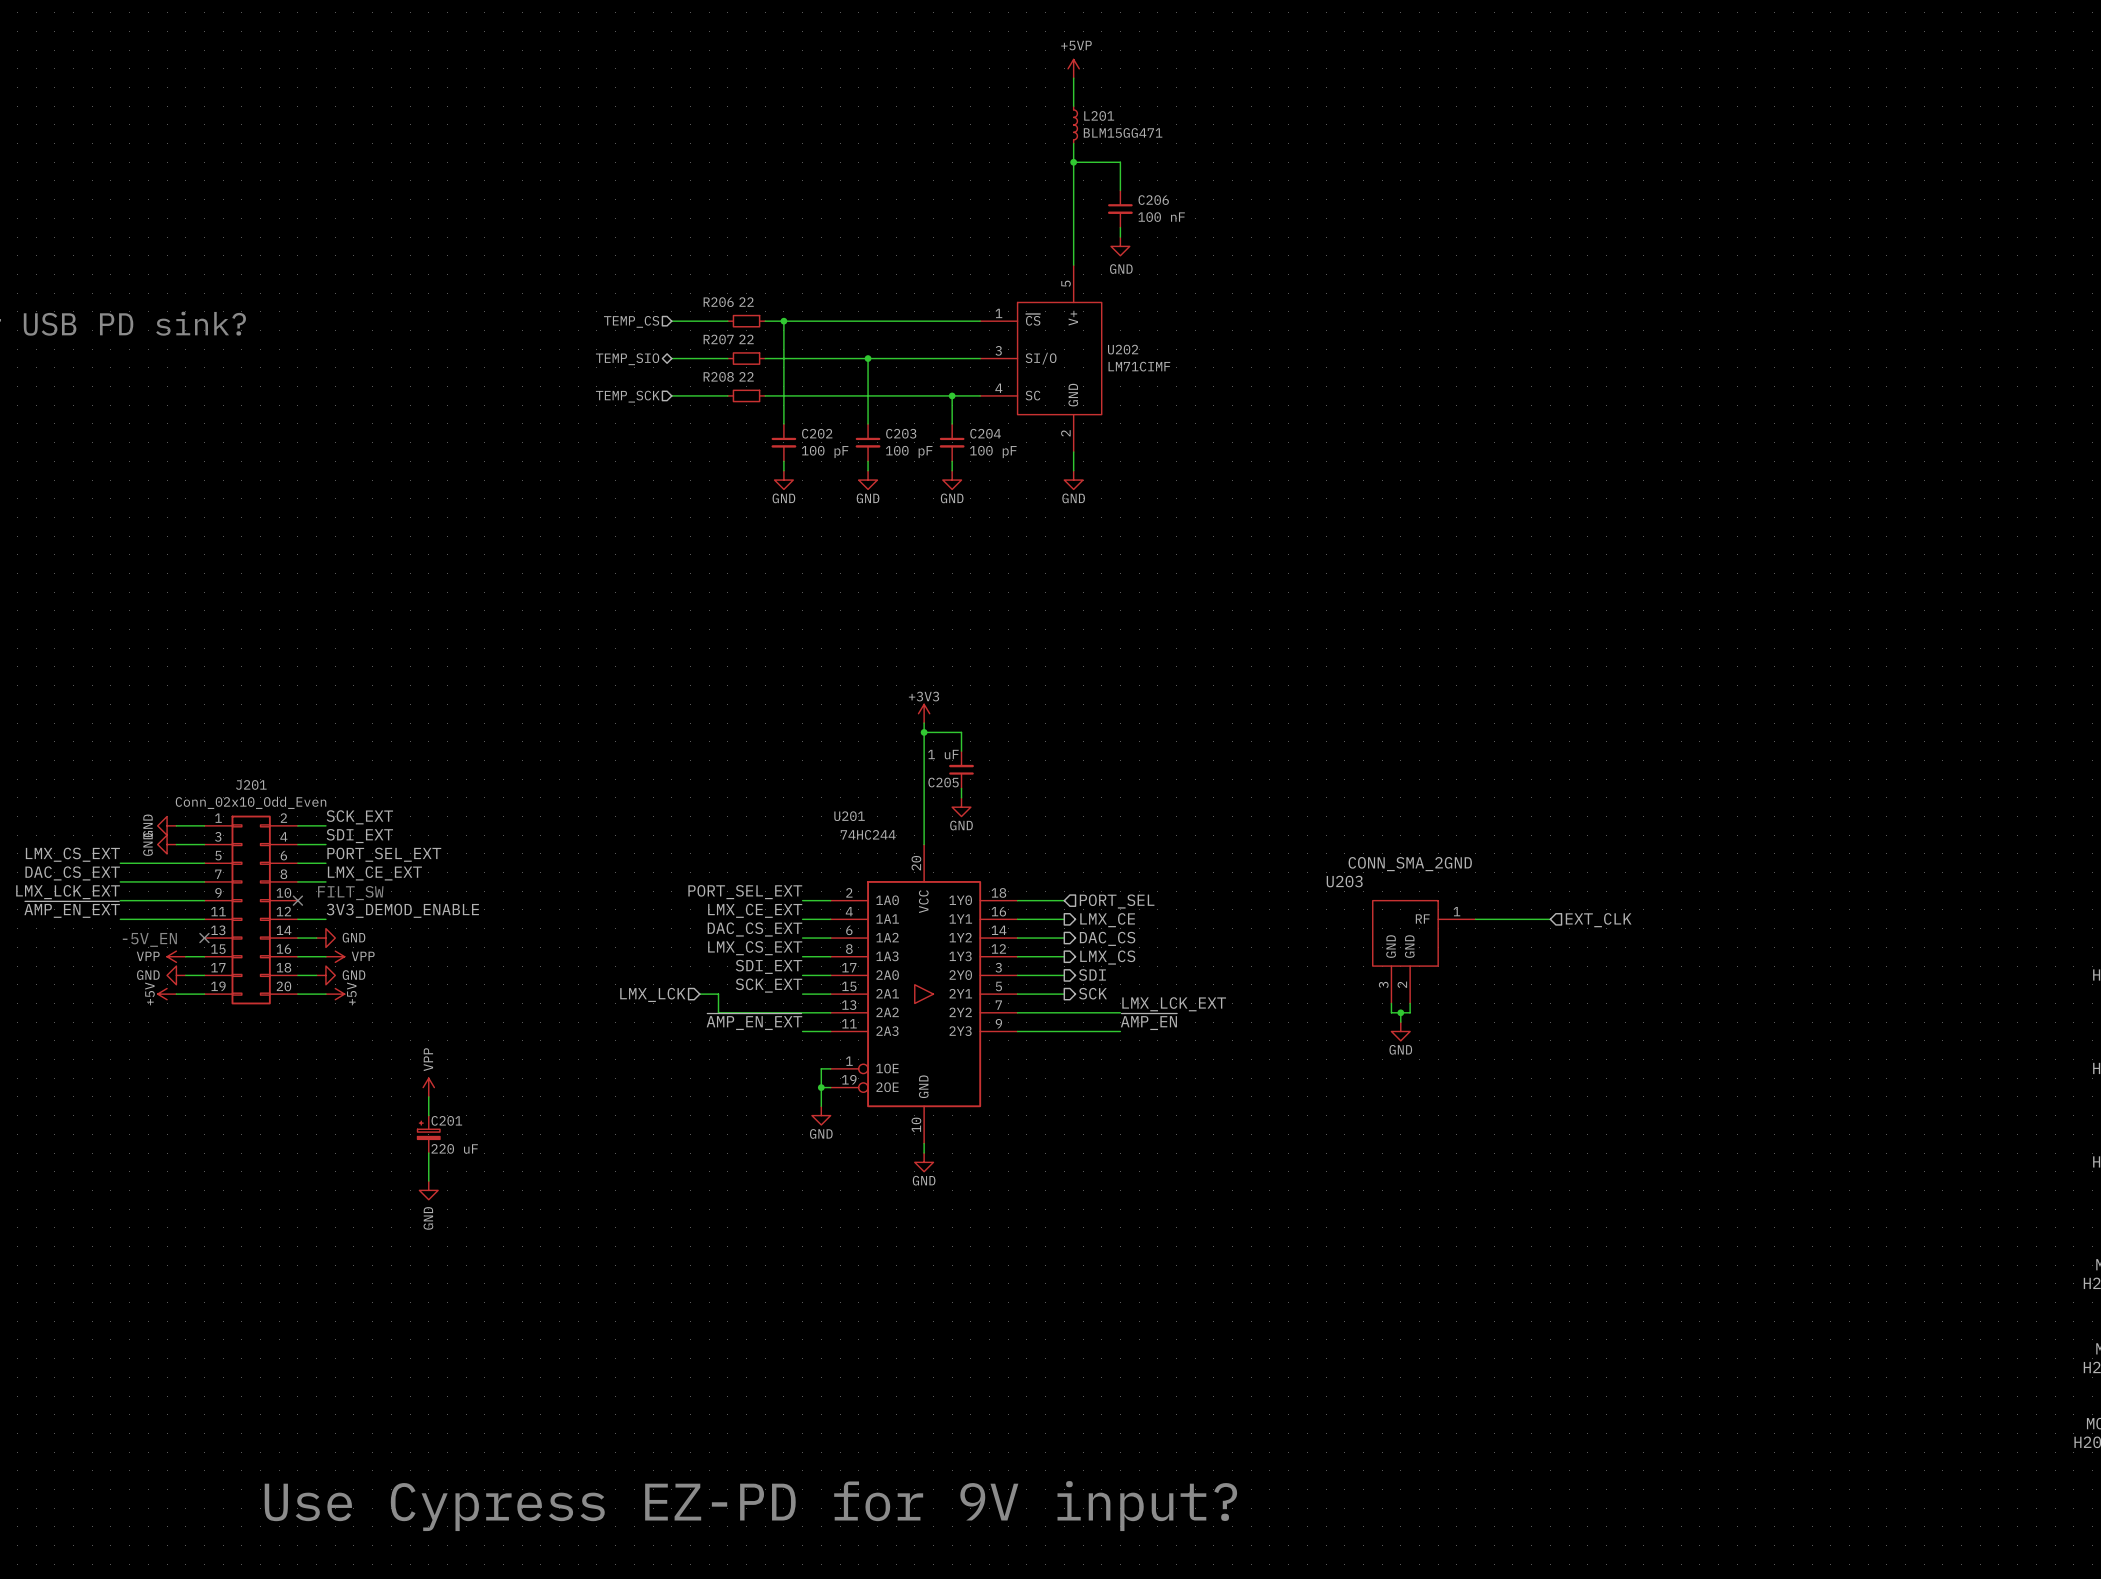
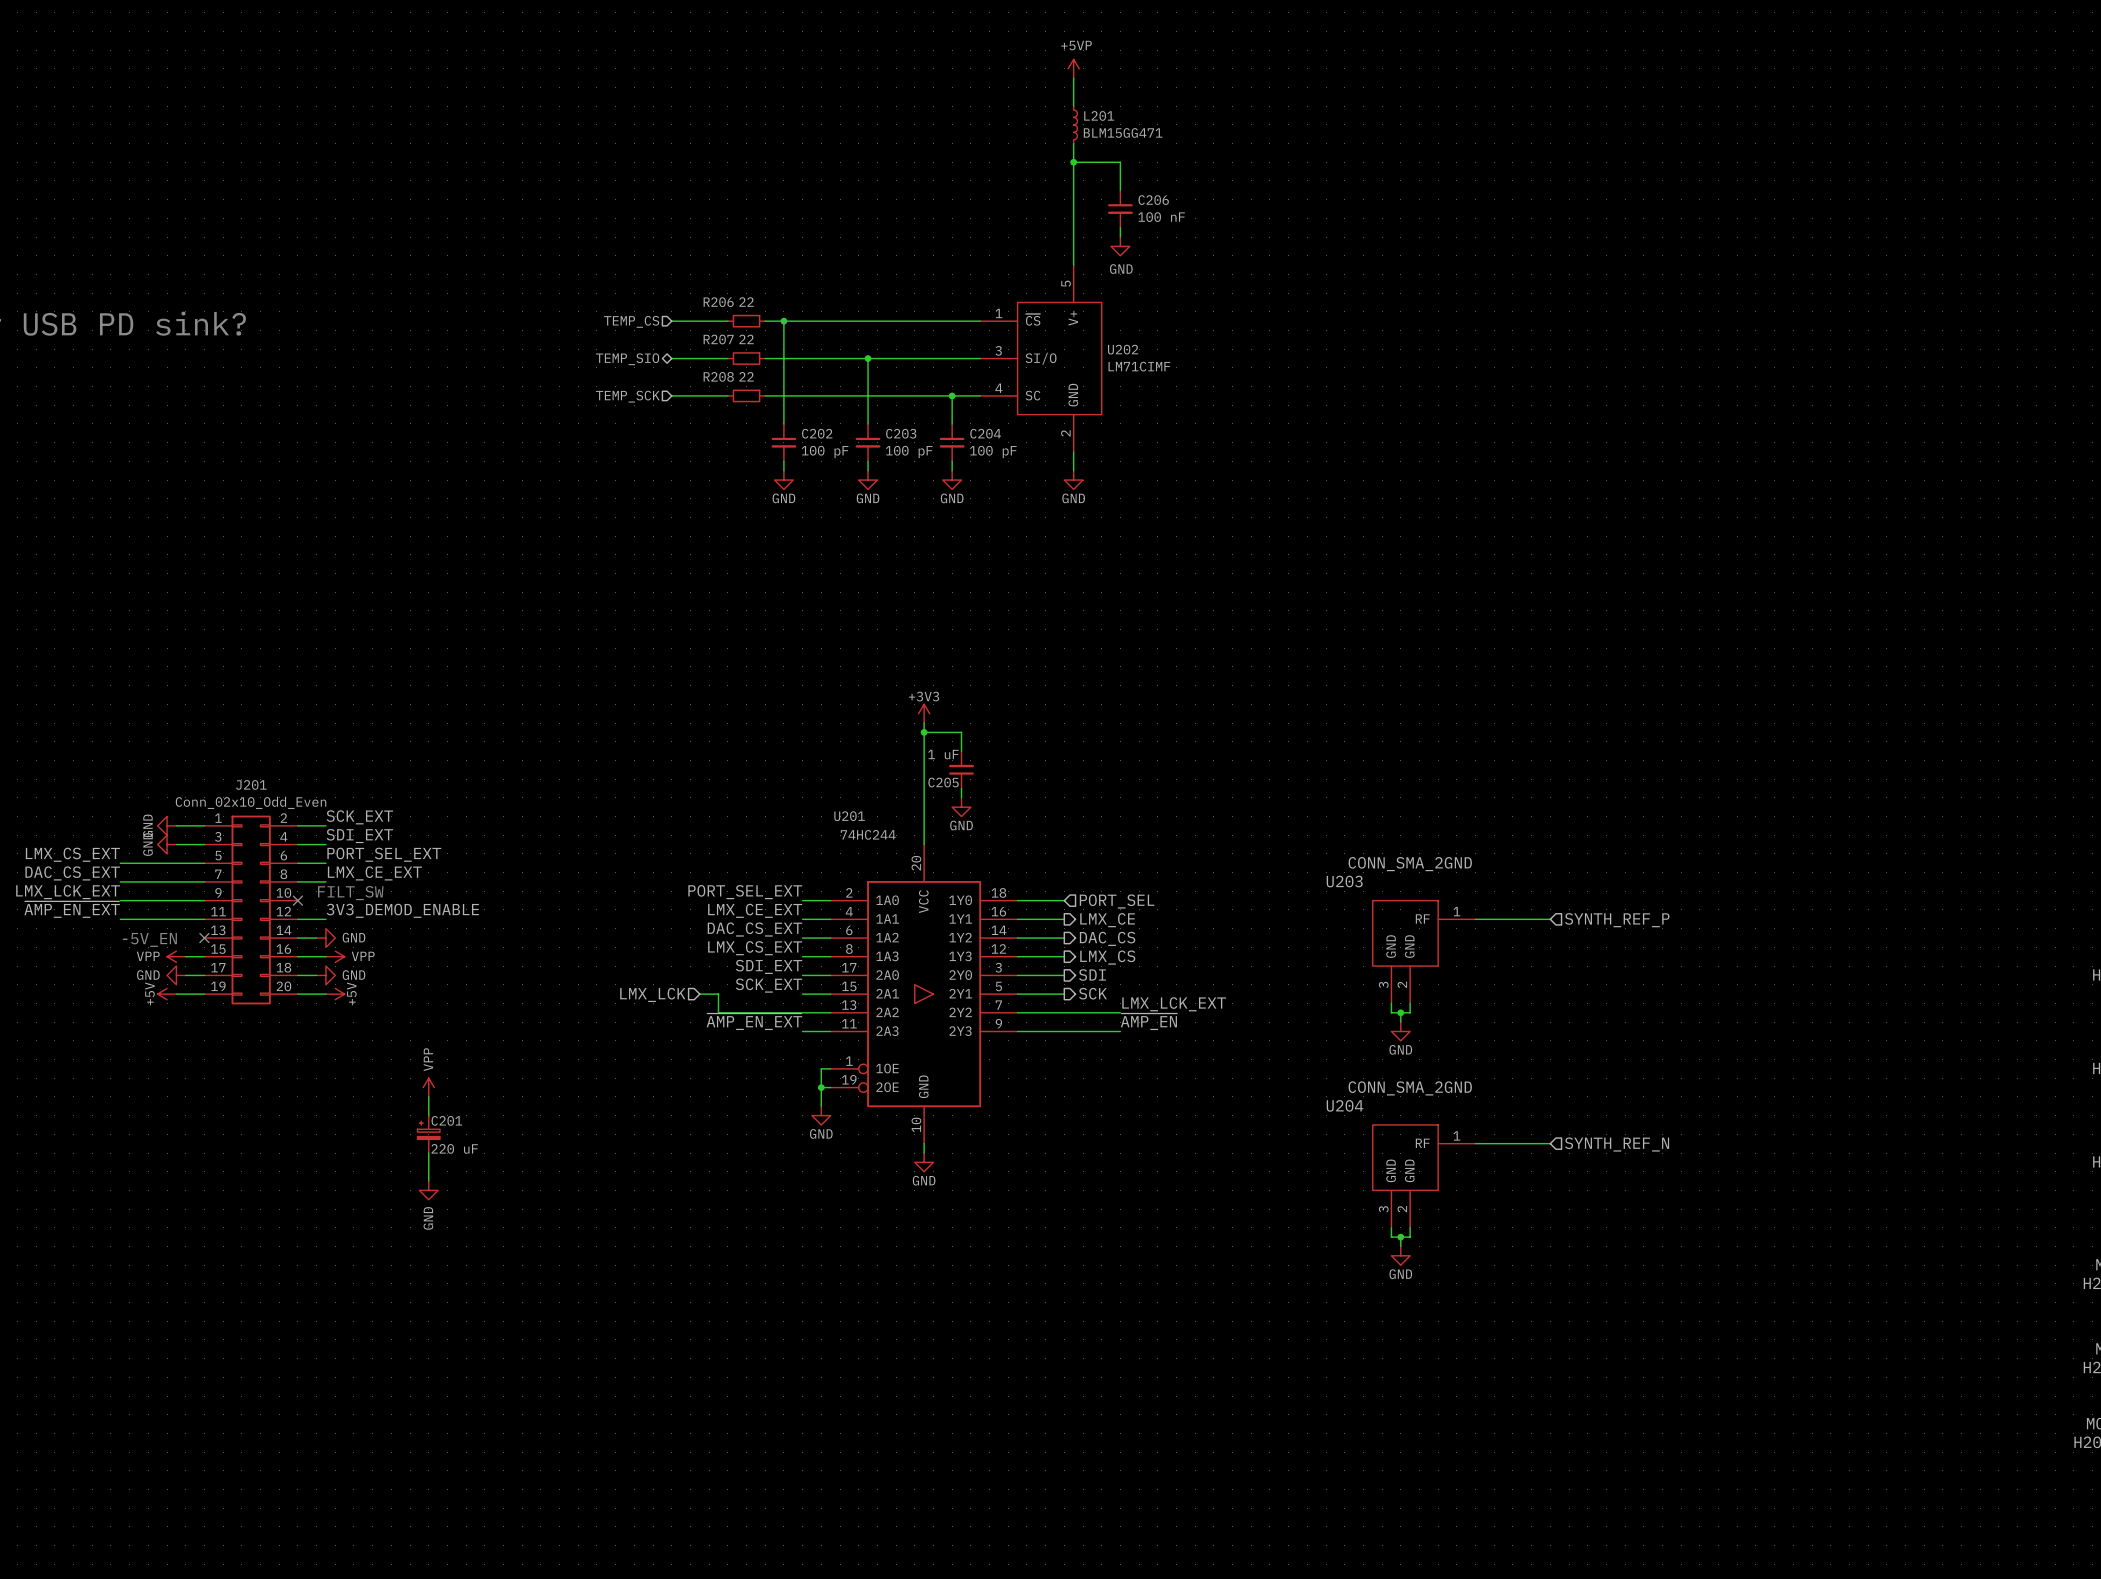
hierarchical label: EXT_CLK (1598, 920) -> SYNTH_REF_P (1617, 920)
wire: none -> (1475, 1143) (1550, 1143)
hierarchical label: none -> SYNTH_REF_N (1617, 1144)
U204: none -> CONN_SMA_2GND (1424, 1176)
wire: none -> (1391, 1227) (1391, 1237) (1410, 1237) (1410, 1227)
wire: none -> (1400, 1237) (1400, 1246)
junction: none -> (1400, 1237)
power symbol: none -> GND (1400, 1255)
text: Use Cypress EZ-PD for 9V input? (750, 1506) -> none

